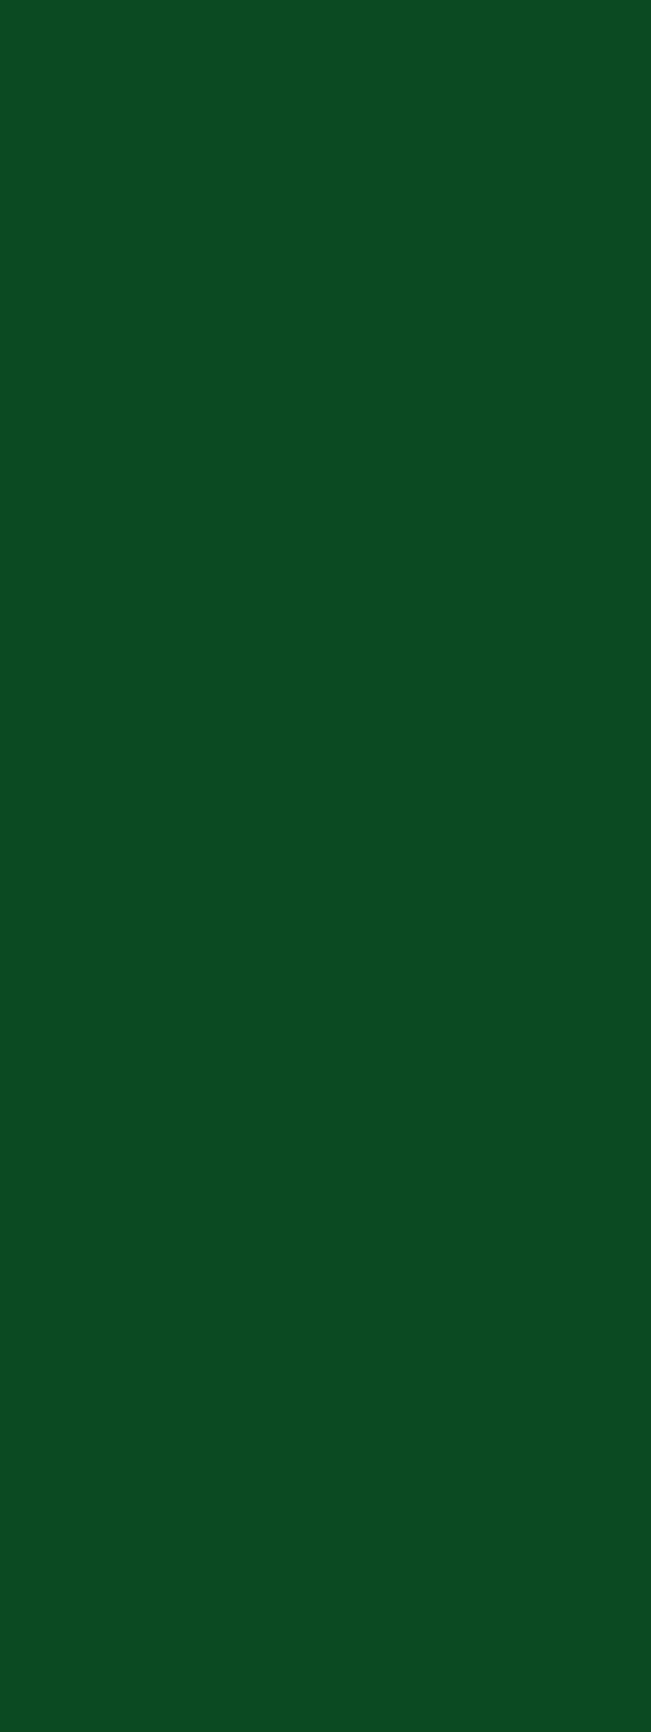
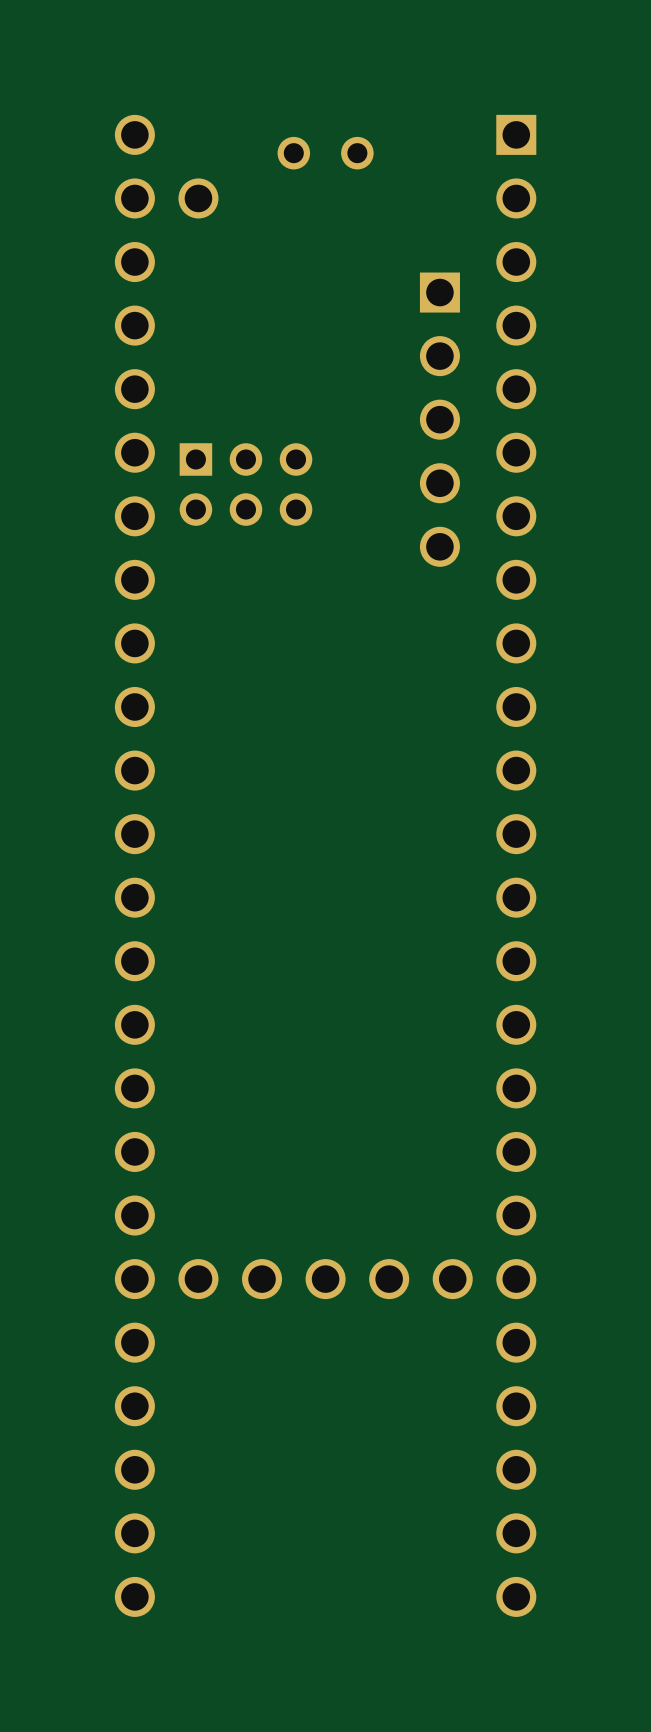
part: none -> (325, 865)

